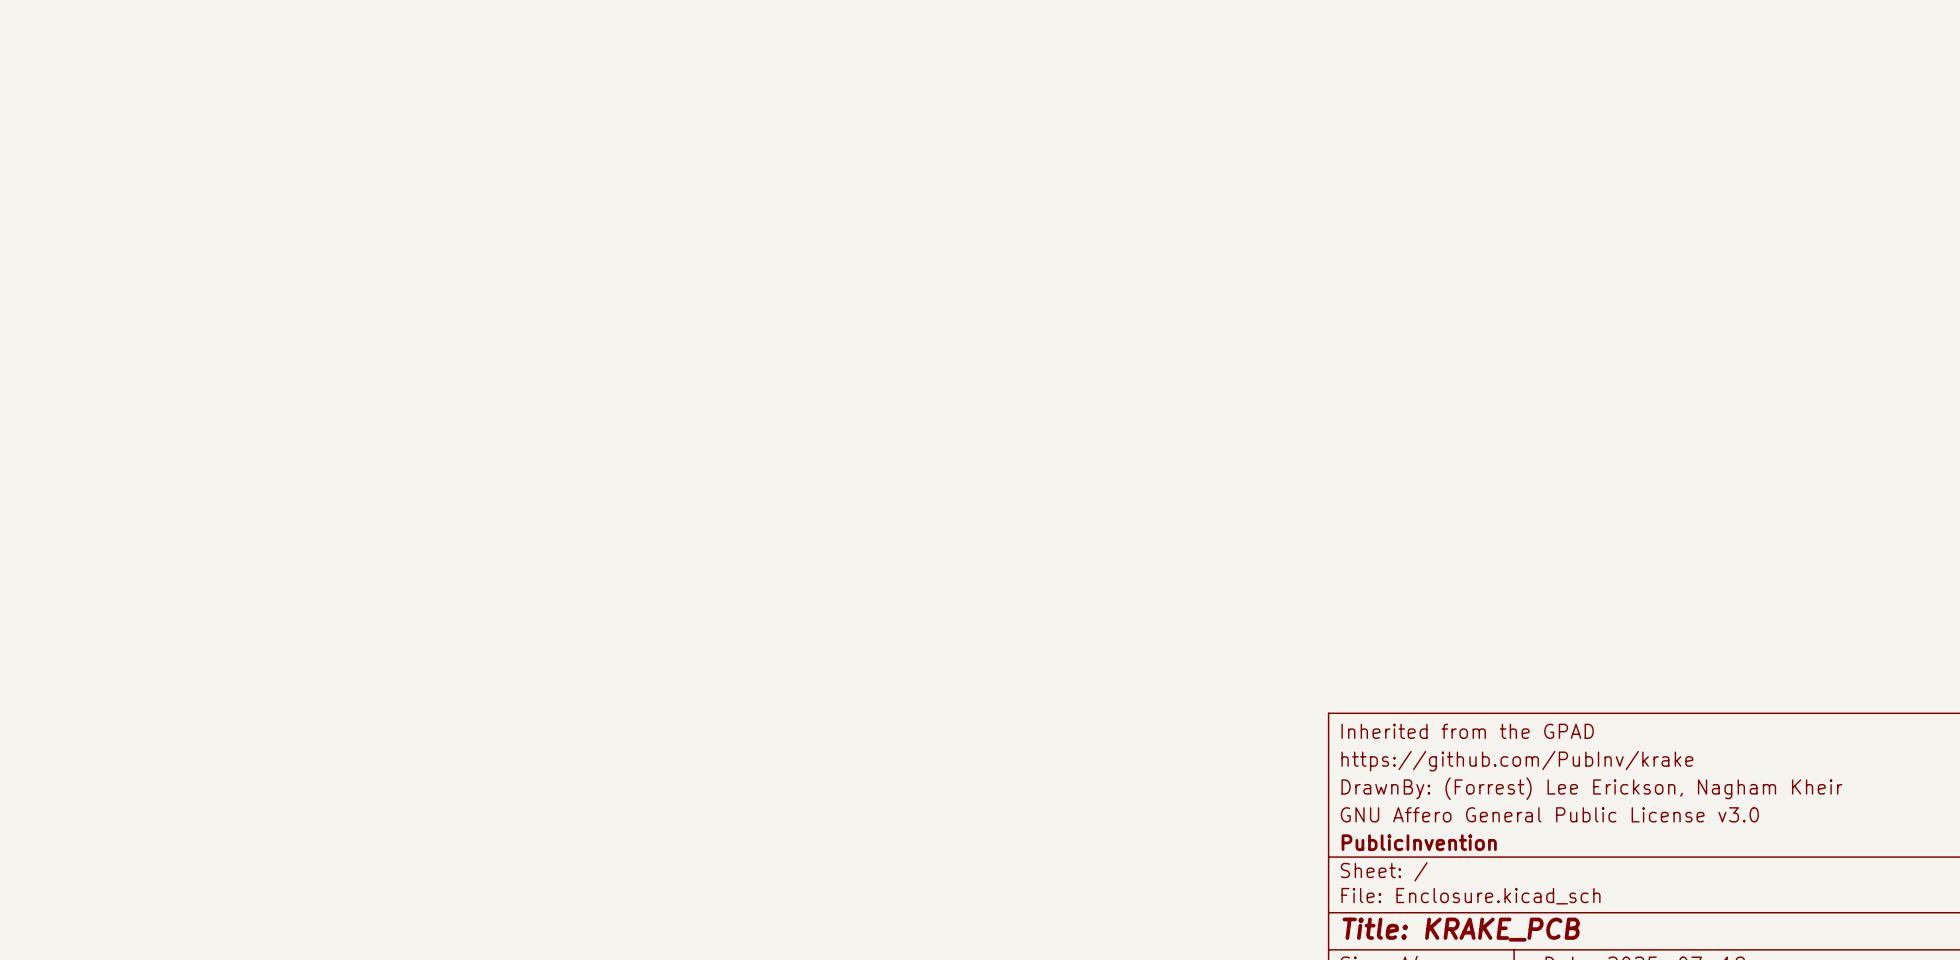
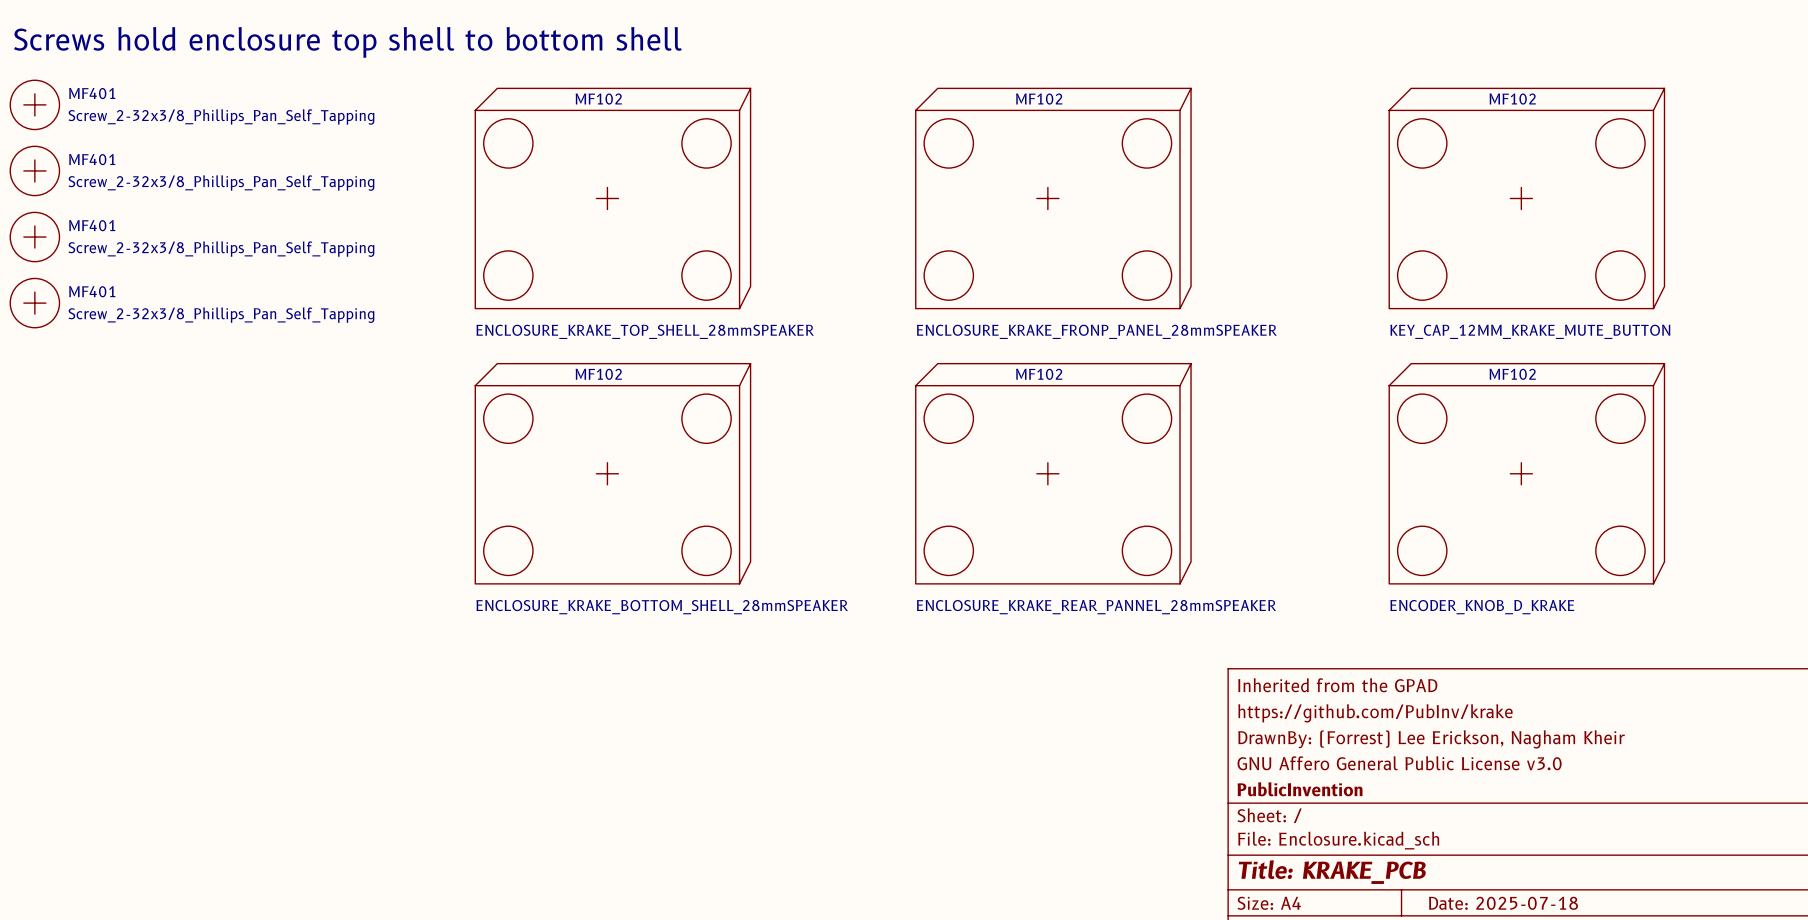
text: none -> Screws hold enclosure top shell to bottom shell (347, 42)
MF401: none -> Screw_2-32x3/8_Phillips_Pan_Self_Tapping (34, 104)
MF401: none -> Screw_2-32x3/8_Phillips_Pan_Self_Tapping (34, 170)
MF102: none -> ENCLOSURE_KRAKE_TOP_SHELL_28mmSPEAKER (612, 198)
MF102: none -> ENCLOSURE_KRAKE_FRONP_PANEL_28mmSPEAKER (1053, 198)
MF102: none -> KEY_CAP_12MM_KRAKE_MUTE_BUTTON (1526, 198)
MF401: none -> Screw_2-32x3/8_Phillips_Pan_Self_Tapping (34, 237)
MF401: none -> Screw_2-32x3/8_Phillips_Pan_Self_Tapping (34, 303)
MF102: none -> ENCLOSURE_KRAKE_BOTTOM_SHELL_28mmSPEAKER (612, 473)
MF102: none -> ENCLOSURE_KRAKE_REAR_PANNEL_28mmSPEAKER (1053, 473)
MF102: none -> ENCODER_KNOB_D_KRAKE (1526, 473)

